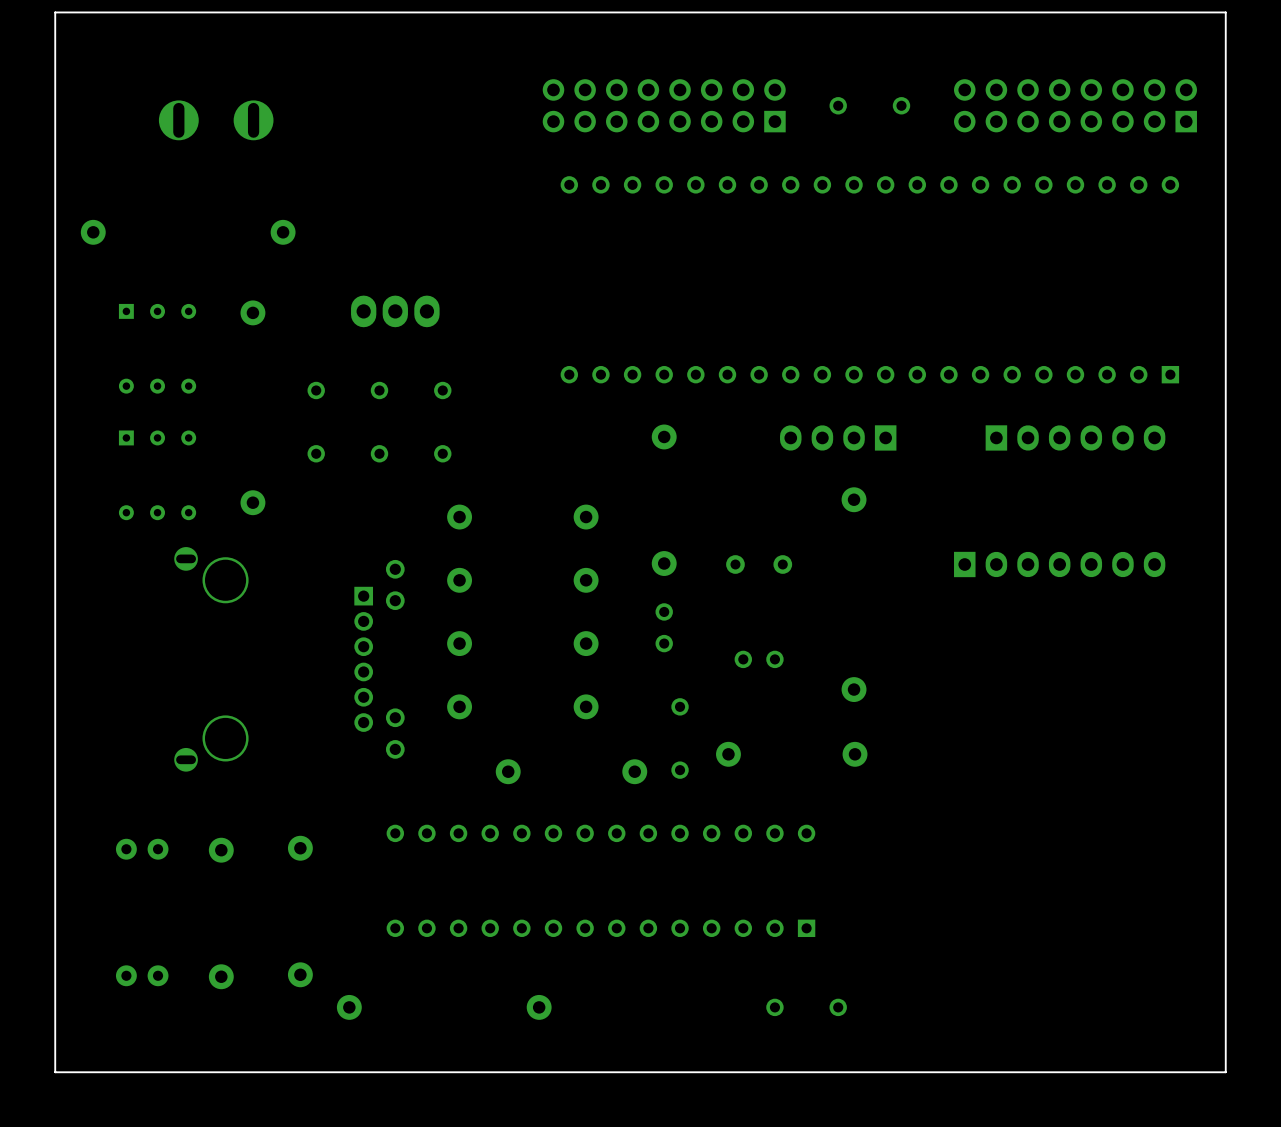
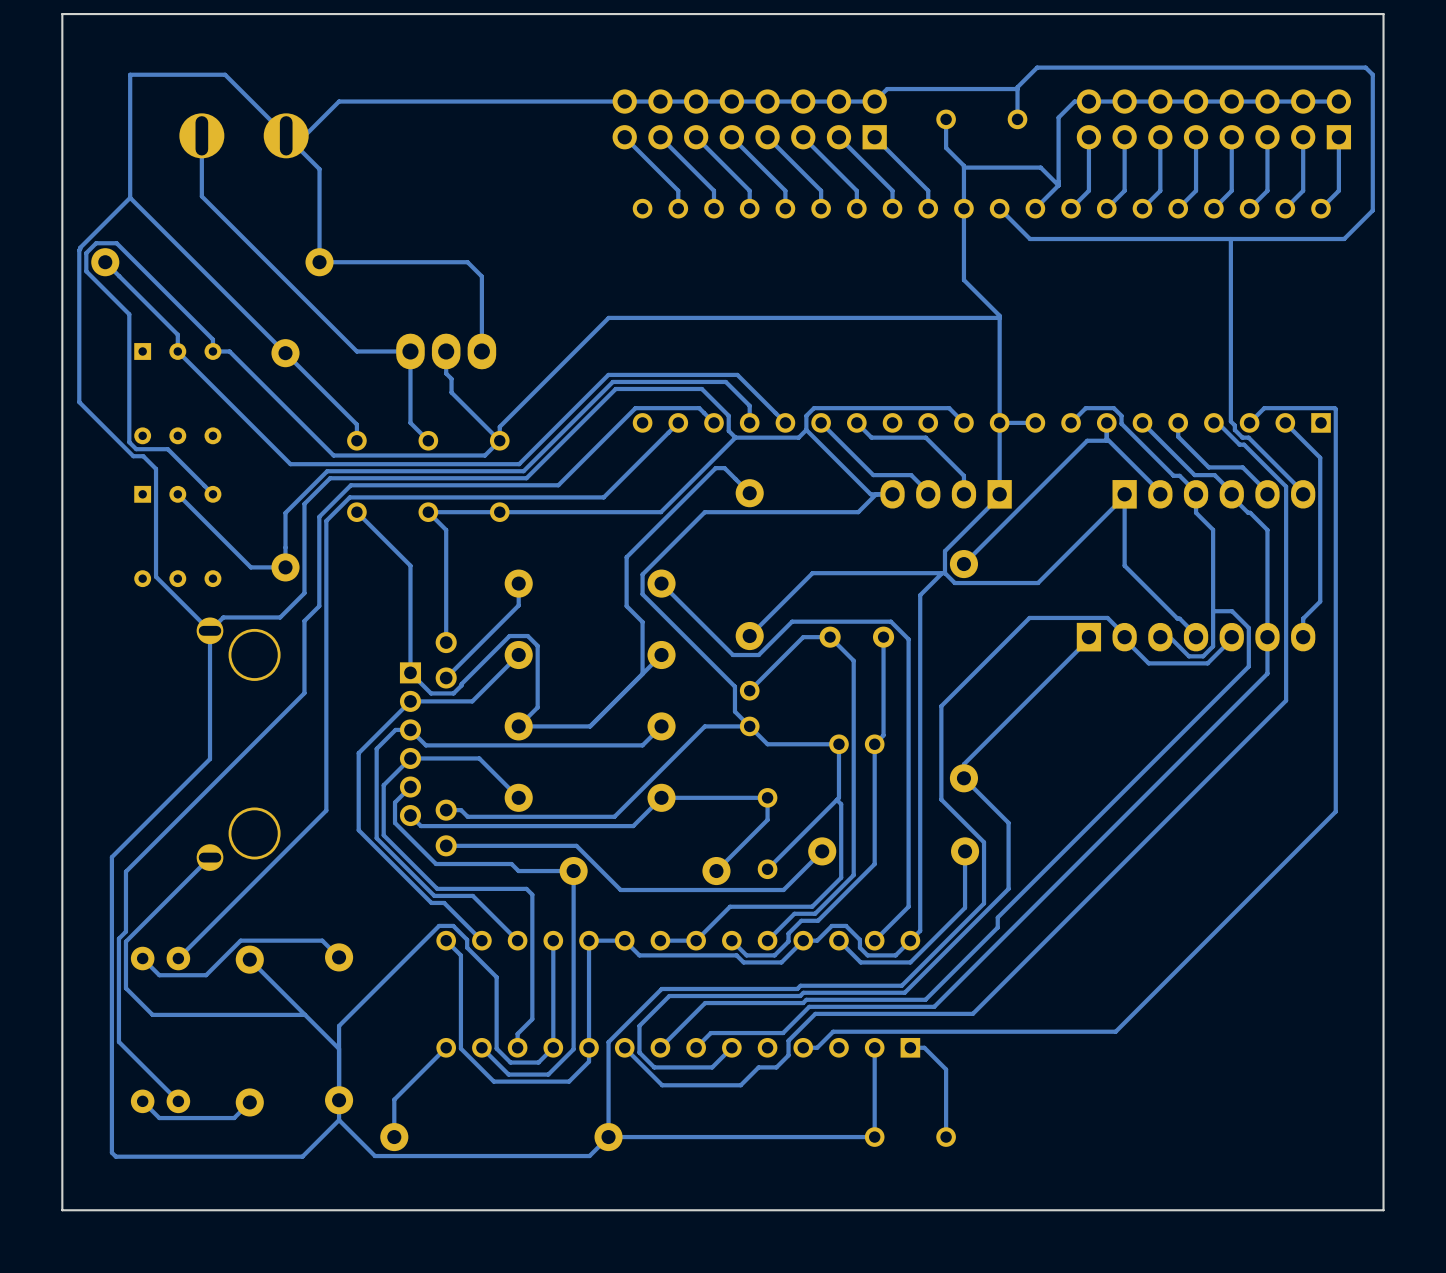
track: none -> (1017, 89) (887, 89) (874, 101) (339, 101) (304, 135) (286, 135)
track: none -> (1338, 101) (1074, 101) (1058, 117) (1058, 185)
track: none -> (946, 119) (946, 147) (963, 165) (963, 280) (999, 315) (999, 496) (944, 551) (944, 573)
track: none -> (1017, 119) (1017, 87) (1037, 67) (1365, 67) (1372, 74) (1372, 210) (1344, 239) (1030, 239) (999, 208)
track: none -> (201, 135) (201, 196) (356, 351) (410, 351) (410, 422) (428, 440)
track: none -> (624, 137) (678, 190) (678, 208)
track: none -> (660, 137) (714, 190) (714, 208)
track: none -> (696, 137) (749, 190) (749, 208)
track: none -> (731, 137) (785, 190) (785, 208)
track: none -> (767, 137) (821, 190) (821, 208)
track: none -> (803, 137) (856, 190) (856, 208)
track: none -> (838, 137) (892, 190) (892, 208)
track: none -> (874, 137) (928, 190) (928, 208)
track: none -> (1088, 137) (1088, 190) (1071, 208)
track: none -> (1124, 137) (1124, 190) (1106, 208)
track: none -> (1160, 137) (1160, 190) (1142, 208)
track: none -> (1196, 137) (1196, 190) (1178, 208)
track: none -> (1231, 137) (1231, 190) (1213, 208)
track: none -> (1267, 137) (1267, 190) (1249, 208)
track: none -> (1303, 137) (1303, 190) (1285, 208)
track: none -> (1338, 137) (1338, 190) (1321, 208)
track: none -> (963, 167) (1040, 167) (1058, 185)
track: none -> (1058, 185) (1035, 208)
track: none -> (130, 197) (79, 250) (79, 402) (133, 456) (143, 456) (156, 468) (156, 576) (210, 630)
track: none -> (130, 197) (356, 424) (356, 440)
track: none -> (130, 197) (130, 74) (225, 74) (319, 169) (319, 262) (467, 262) (481, 276) (481, 351)
track: none -> (1230, 239) (1230, 421) (1234, 425) (1234, 429) (1242, 437) (1248, 437) (1303, 494)
track: none -> (105, 262) (177, 334) (177, 351) (290, 464) (519, 464) (608, 374) (737, 374) (785, 422)
track: none -> (999, 317) (608, 317) (499, 426) (499, 440)
track: none -> (446, 351) (446, 373) (451, 378) (451, 392) (499, 440)
track: none -> (678, 422) (603, 497) (349, 497) (326, 520) (326, 810) (178, 958)
track: none -> (714, 422) (699, 408) (635, 408) (558, 485) (350, 485) (319, 516) (319, 606) (304, 620) (304, 693) (125, 871) (125, 931) (118, 938) (118, 1041) (178, 1101)
track: none -> (749, 422) (749, 405) (725, 381) (612, 381) (523, 471) (327, 471) (285, 512) (285, 567) (250, 567) (177, 494)
track: none -> (821, 422) (873, 475) (911, 475) (928, 494)
track: none -> (856, 422) (871, 437) (925, 437) (963, 475) (963, 494)
track: none -> (963, 422) (949, 408) (814, 408) (806, 415) (806, 429)
track: none -> (1035, 422) (999, 422)
track: none -> (1071, 422) (1085, 408) (1113, 408) (1121, 415) (1121, 423) (1173, 475) (1179, 475) (1196, 492) (1196, 512) (1213, 529) (1213, 646) (1203, 656) (1188, 656) (1169, 637) (1160, 637) (1160, 635)
track: none -> (1106, 422) (1106, 440) (1087, 440) (963, 564)
track: none -> (1142, 422) (1194, 475) (1214, 475) (1231, 492) (1231, 496) (1267, 530) (1267, 673) (934, 1006) (809, 1006) (783, 1033) (710, 1033) (696, 1047)
track: none -> (1178, 422) (1178, 436) (1208, 467) (1242, 467) (1267, 494)
track: none -> (1213, 422) (1217, 422) (1239, 444) (1244, 444) (1286, 486) (1286, 700) (972, 1013) (815, 1013) (788, 1040) (788, 1055) (776, 1067) (758, 1067) (740, 1085) (662, 1085) (624, 1047)
track: none -> (1249, 422) (1264, 408) (1335, 409) (1335, 811) (1115, 1031) (833, 1031) (817, 1047) (803, 1047)
track: none -> (1285, 422) (1320, 457) (1320, 601) (1303, 618) (1303, 637)
track: none -> (806, 429) (798, 437) (735, 437)
track: none -> (806, 429) (870, 494) (892, 494)
track: none -> (735, 437) (728, 430) (728, 415) (701, 388) (615, 388) (526, 478) (330, 478) (304, 503) (304, 593) (280, 617) (223, 617) (210, 630)
track: none -> (735, 437) (660, 512) (428, 512) (446, 530) (446, 642)
track: none -> (1106, 438) (1160, 494)
track: none -> (499, 440) (485, 455) (333, 455) (229, 351) (212, 351) (212, 339) (116, 243) (96, 243) (86, 253) (86, 271) (129, 314) (129, 442) (136, 449) (167, 449) (212, 494)
track: none -> (749, 493) (724, 468) (715, 468) (626, 557) (626, 606) (642, 622) (642, 673)
track: none -> (876, 494) (858, 512) (704, 512) (642, 574) (642, 594) (734, 686) (734, 711) (767, 744) (838, 744) (838, 797) (767, 869)
track: none -> (1124, 494) (1124, 565) (1179, 618) (1196, 637)
track: none -> (1124, 496) (1038, 583) (954, 583) (944, 573)
track: none -> (356, 512) (410, 565) (410, 672) (431, 693) (453, 693) (509, 636) (527, 636) (537, 645) (537, 707) (518, 726) (590, 726) (661, 655)
track: none -> (942, 573) (920, 595) (920, 930) (895, 955) (867, 955) (859, 947) (859, 939) (846, 925) (831, 925) (817, 940) (803, 940) (781, 962) (743, 962) (736, 955) (639, 955) (624, 940) (589, 940) (589, 1061) (569, 1081) (493, 1081) (460, 1048) (460, 955) (446, 940)
track: none -> (944, 573) (812, 573) (749, 636)
track: none -> (518, 583) (518, 605) (446, 677)
track: none -> (661, 583) (732, 655) (758, 655) (792, 621) (890, 621) (908, 639) (908, 906) (874, 940)
track: none -> (1213, 611) (1232, 611) (1248, 627) (1248, 666) (997, 917) (997, 927) (925, 999) (806, 999) (803, 1003) (705, 1003) (660, 1047)
track: none -> (210, 630) (210, 759) (111, 857) (111, 1152) (115, 1156) (302, 1156) (339, 1120)
track: none -> (883, 637) (883, 735) (874, 744) (874, 864) (818, 920) (801, 920) (788, 933) (788, 941) (774, 955) (746, 955) (731, 940)
track: none -> (1088, 637) (1088, 639) (963, 764) (963, 778) (1008, 822) (1008, 888) (904, 992) (803, 992) (800, 996) (669, 996) (639, 1025) (639, 1052) (654, 1067) (712, 1067) (731, 1047)
track: none -> (1231, 637) (1207, 663) (1148, 663) (1124, 639) (1124, 635) (1107, 617) (1029, 617) (941, 706) (941, 799) (984, 842) (984, 903) (901, 985) (800, 985) (797, 988) (661, 988) (608, 1042) (608, 1137)
track: none -> (518, 655) (472, 701) (410, 701) (358, 753) (358, 830) (431, 902) (444, 902) (481, 940)
track: none -> (749, 690) (803, 637) (830, 637) (853, 660) (853, 875) (815, 913) (794, 913) (767, 940)
track: none -> (661, 726) (642, 745) (425, 745) (410, 729) (395, 729) (376, 748) (376, 838) (434, 895) (472, 895) (517, 940)
track: none -> (749, 726) (704, 726) (614, 816) (467, 816) (461, 810) (446, 810)
track: none -> (410, 787) (395, 802) (395, 822) (436, 864) (511, 864) (518, 871) (573, 871) (573, 1049) (548, 1074) (508, 1074) (481, 1047)
track: none -> (518, 797) (479, 758) (410, 758) (383, 785) (383, 835) (437, 888) (526, 888) (532, 894) (532, 1019) (517, 1033) (517, 1047)
track: none -> (836, 799) (841, 804) (841, 877) (812, 906) (730, 906) (696, 940) (660, 940)
track: none -> (410, 815) (421, 826) (633, 826) (661, 797) (767, 797) (767, 819) (716, 871)
track: none -> (446, 845) (576, 845) (620, 890) (783, 890) (822, 851)
track: none -> (965, 851) (965, 907) (910, 962) (860, 962) (838, 940)
track: none -> (210, 857) (125, 941) (125, 988) (152, 1014) (305, 1014)
track: none -> (553, 940) (553, 1047) (538, 1062) (510, 1062) (496, 1048) (496, 977) (467, 947) (467, 939) (453, 925) (439, 925) (339, 1025) (339, 1120)
track: none -> (339, 957) (322, 940) (240, 940) (206, 975) (159, 975) (142, 958)
track: none -> (249, 959) (339, 1048)
track: none -> (446, 1047) (394, 1099) (394, 1137)
track: none -> (874, 1047) (874, 1137) (608, 1137)
track: none -> (910, 1047) (924, 1047) (946, 1069) (946, 1137)
track: none -> (142, 1101) (159, 1118) (234, 1118) (249, 1102)
track: none -> (339, 1120) (374, 1156) (589, 1156) (608, 1137)

